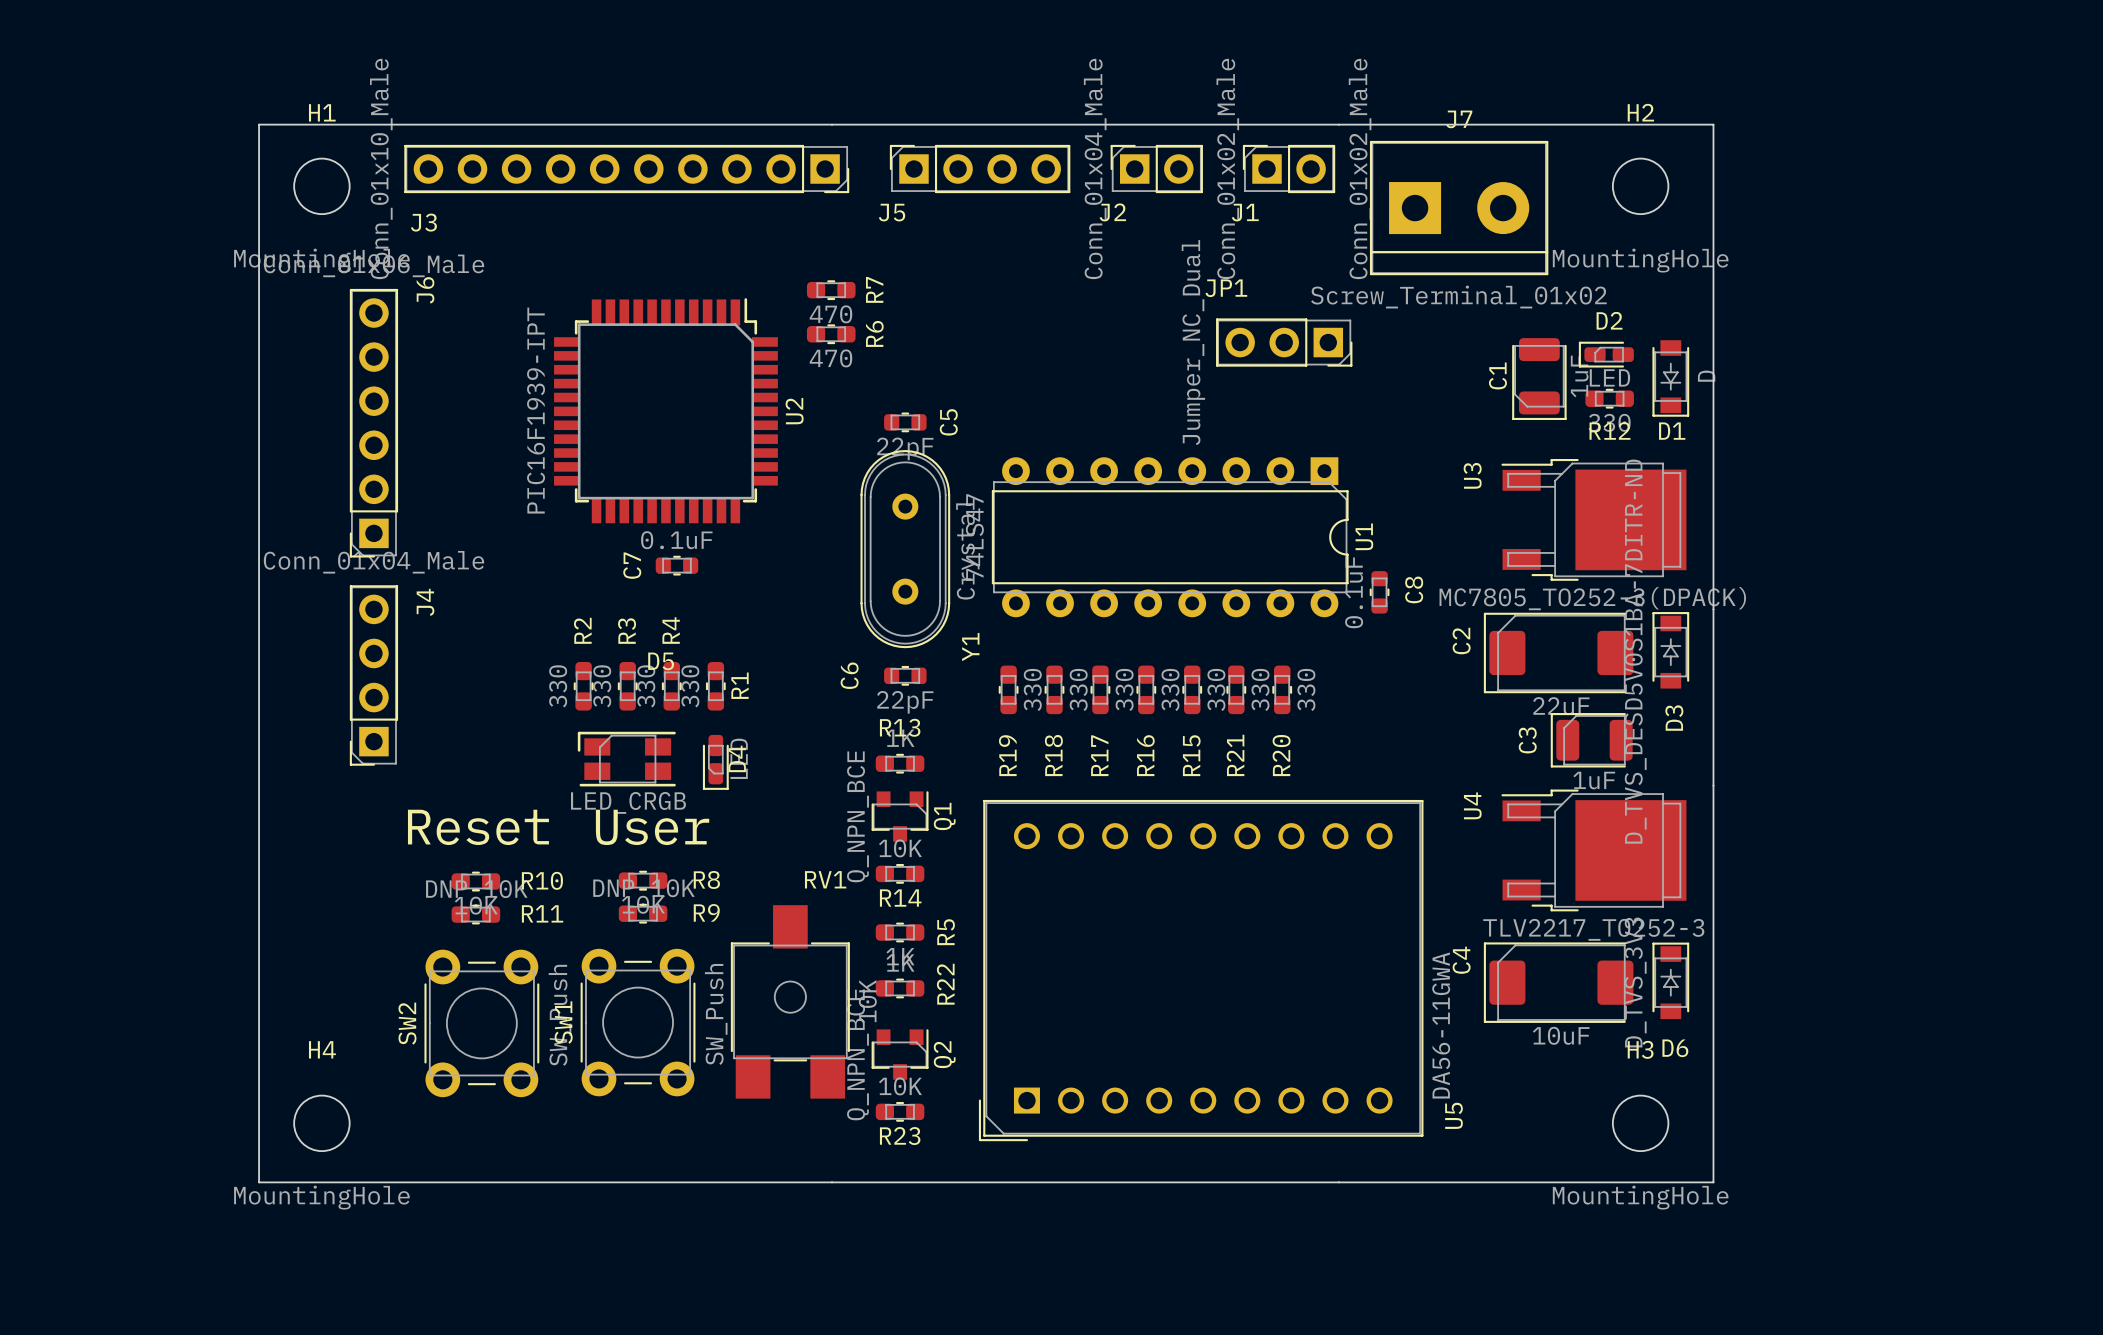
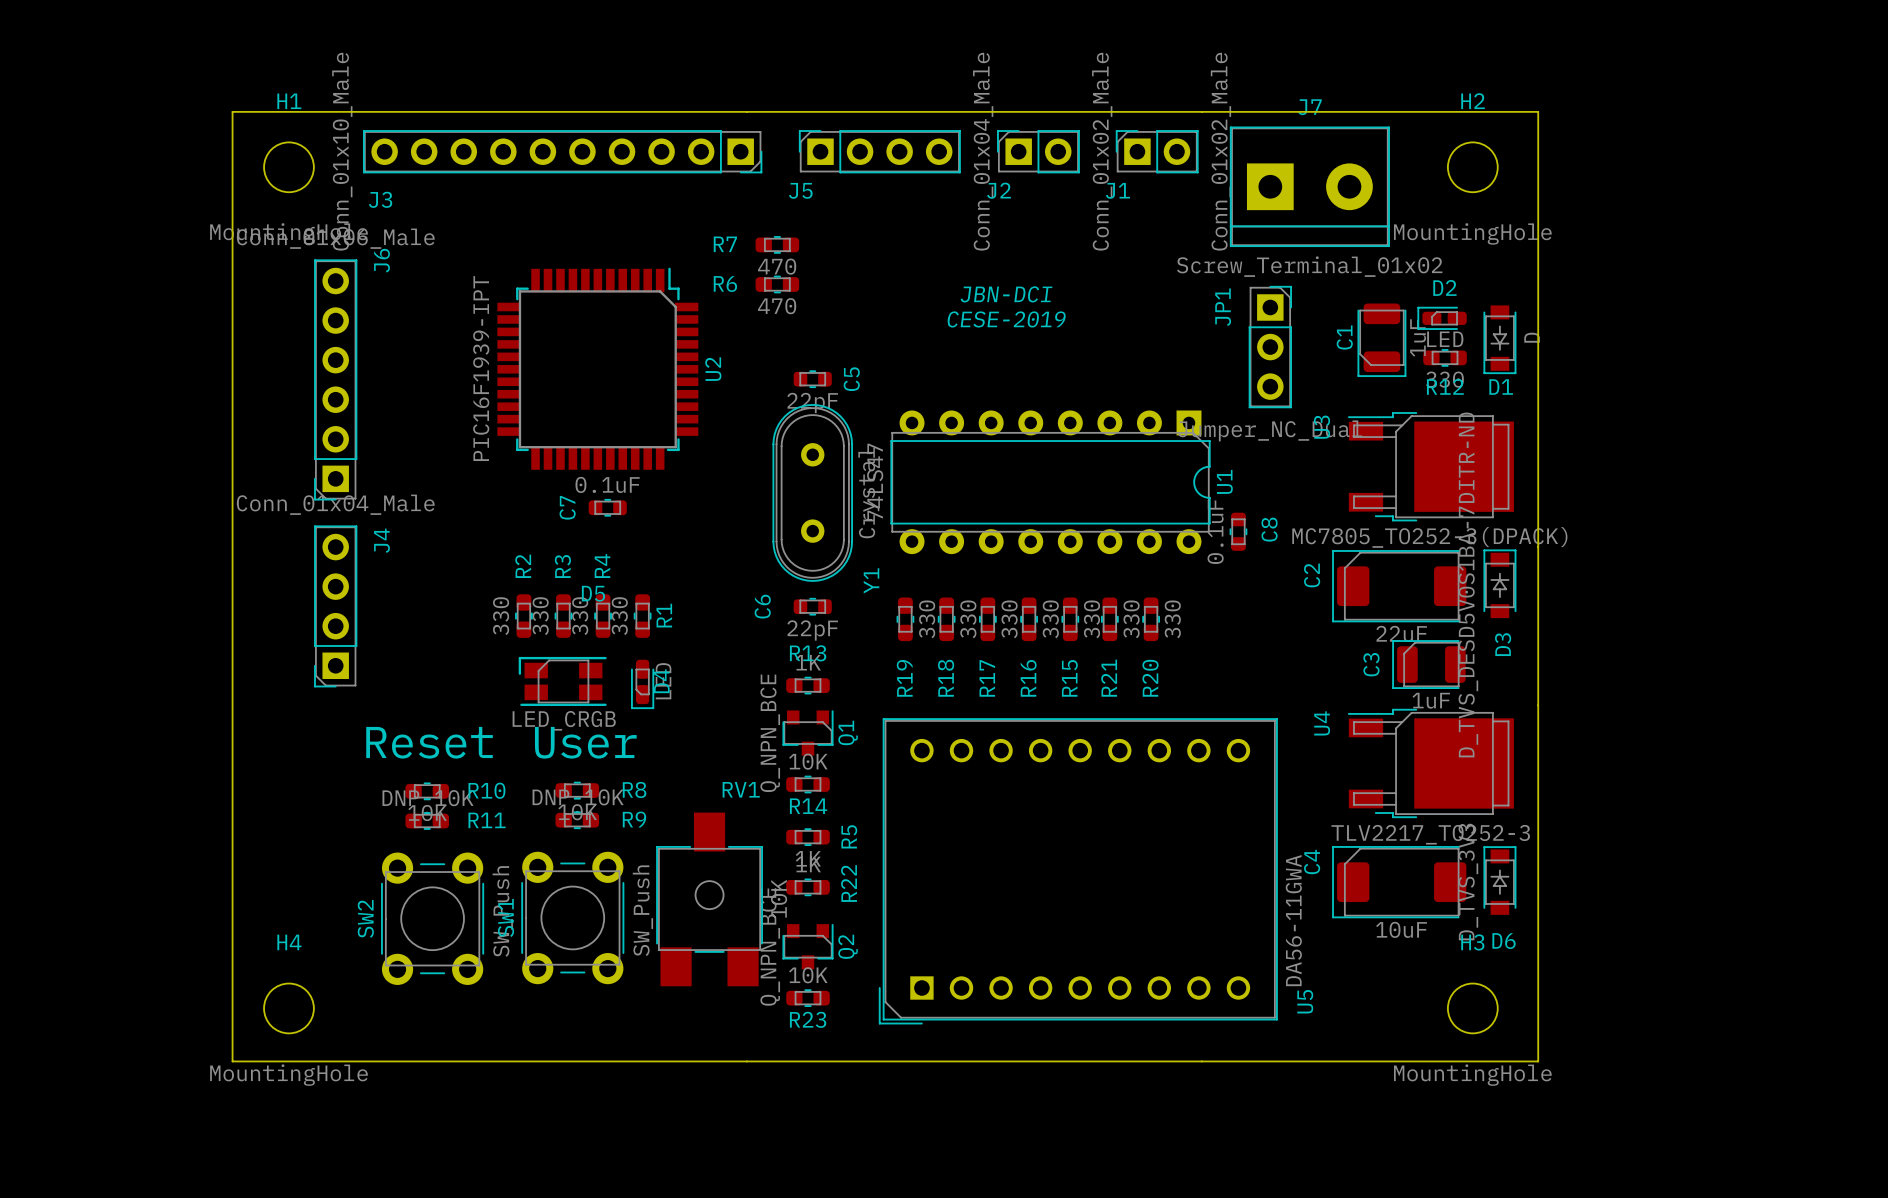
R7 name rotation: 0° (874, 289) -> 90° clockwise (725, 244)
R7 name position: R7 (874, 289) -> R7 (725, 244)
R7 position: (831, 290) -> (777, 244)
text: none -> JBN-DCI (1006, 294)
R6 name rotation: 0° (874, 333) -> 90° clockwise (725, 284)
R6 name position: R6 (874, 333) -> R6 (725, 284)
R6 position: (831, 334) -> (777, 284)
JP1 rotation: 0° (1284, 342) -> 90° counterclockwise (1270, 347)
JP1 position: (1284, 342) -> (1270, 347)
text: none -> CESE-2019 (1006, 319)

